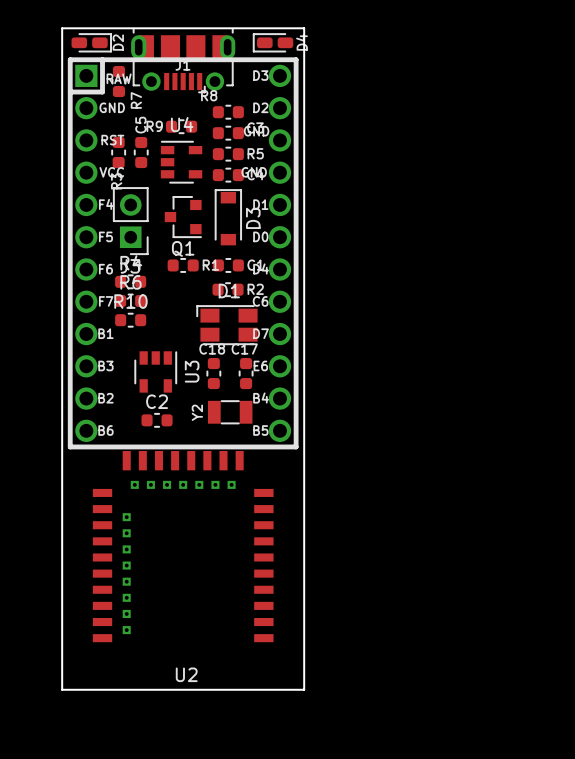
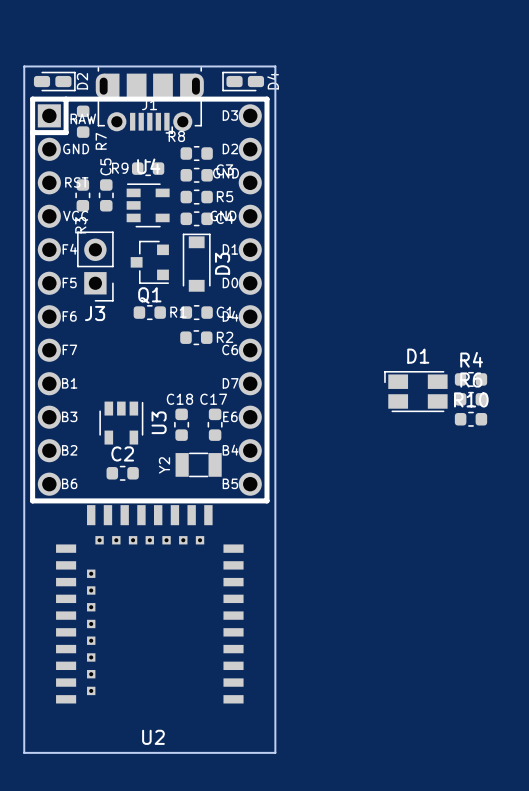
R4 position: (130, 281) -> (471, 379)
R6 position: (130, 301) -> (471, 399)
R10 position: (130, 320) -> (471, 419)
D1 position: (227, 325) -> (415, 391)

